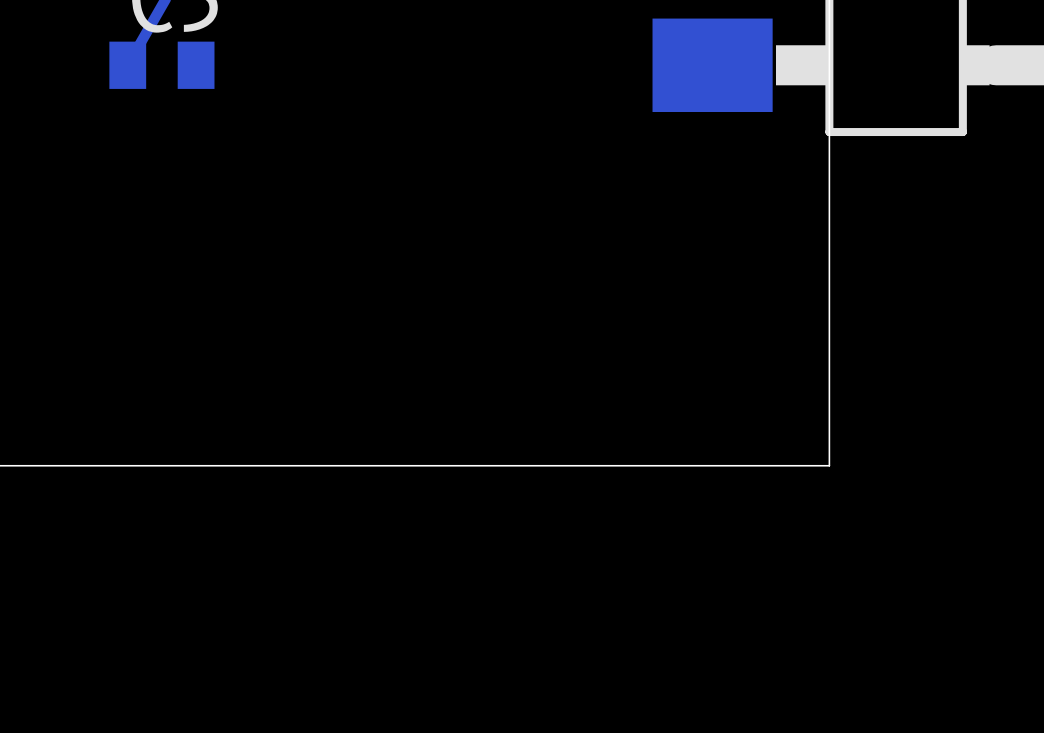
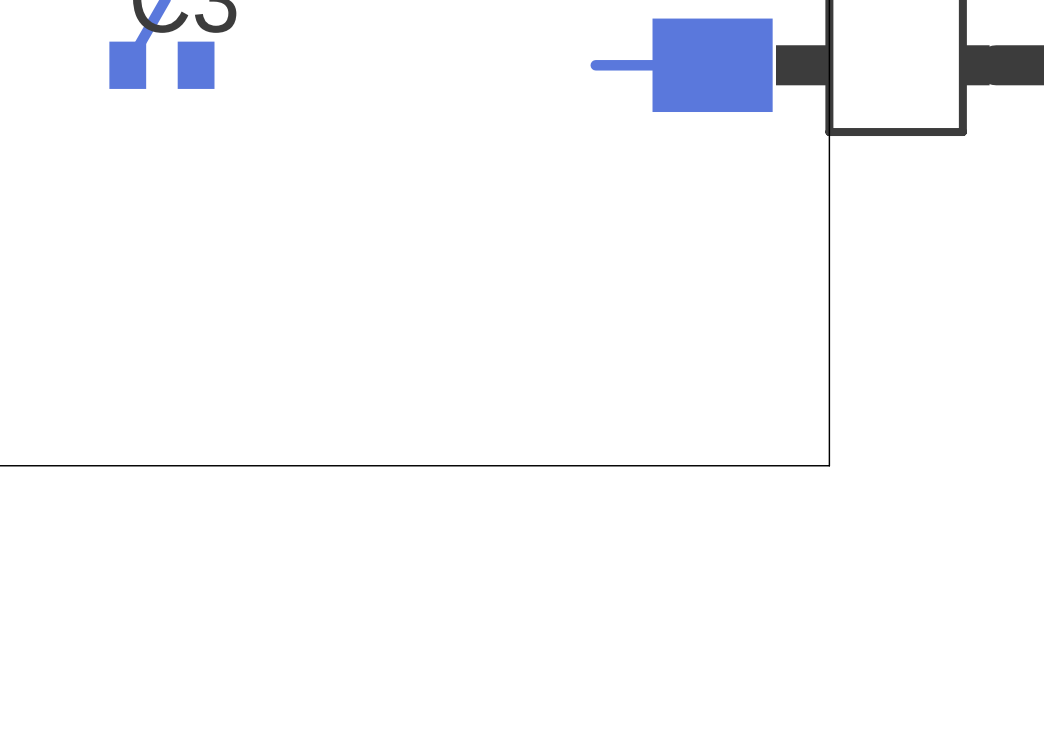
track: none -> (712, 65) (595, 65)

